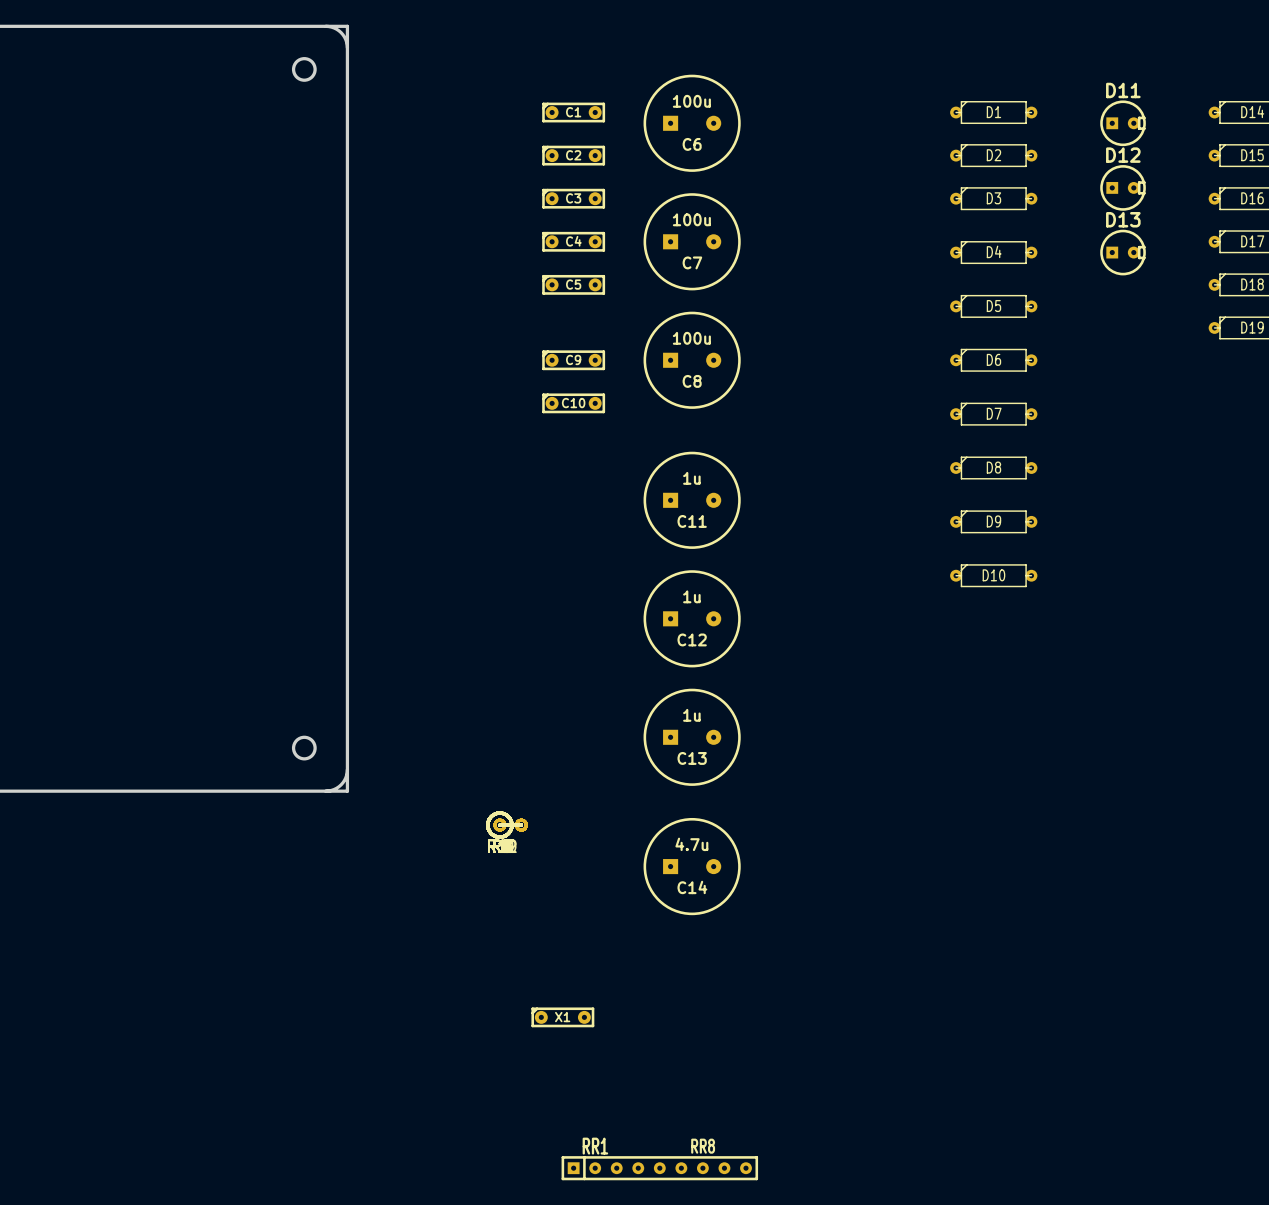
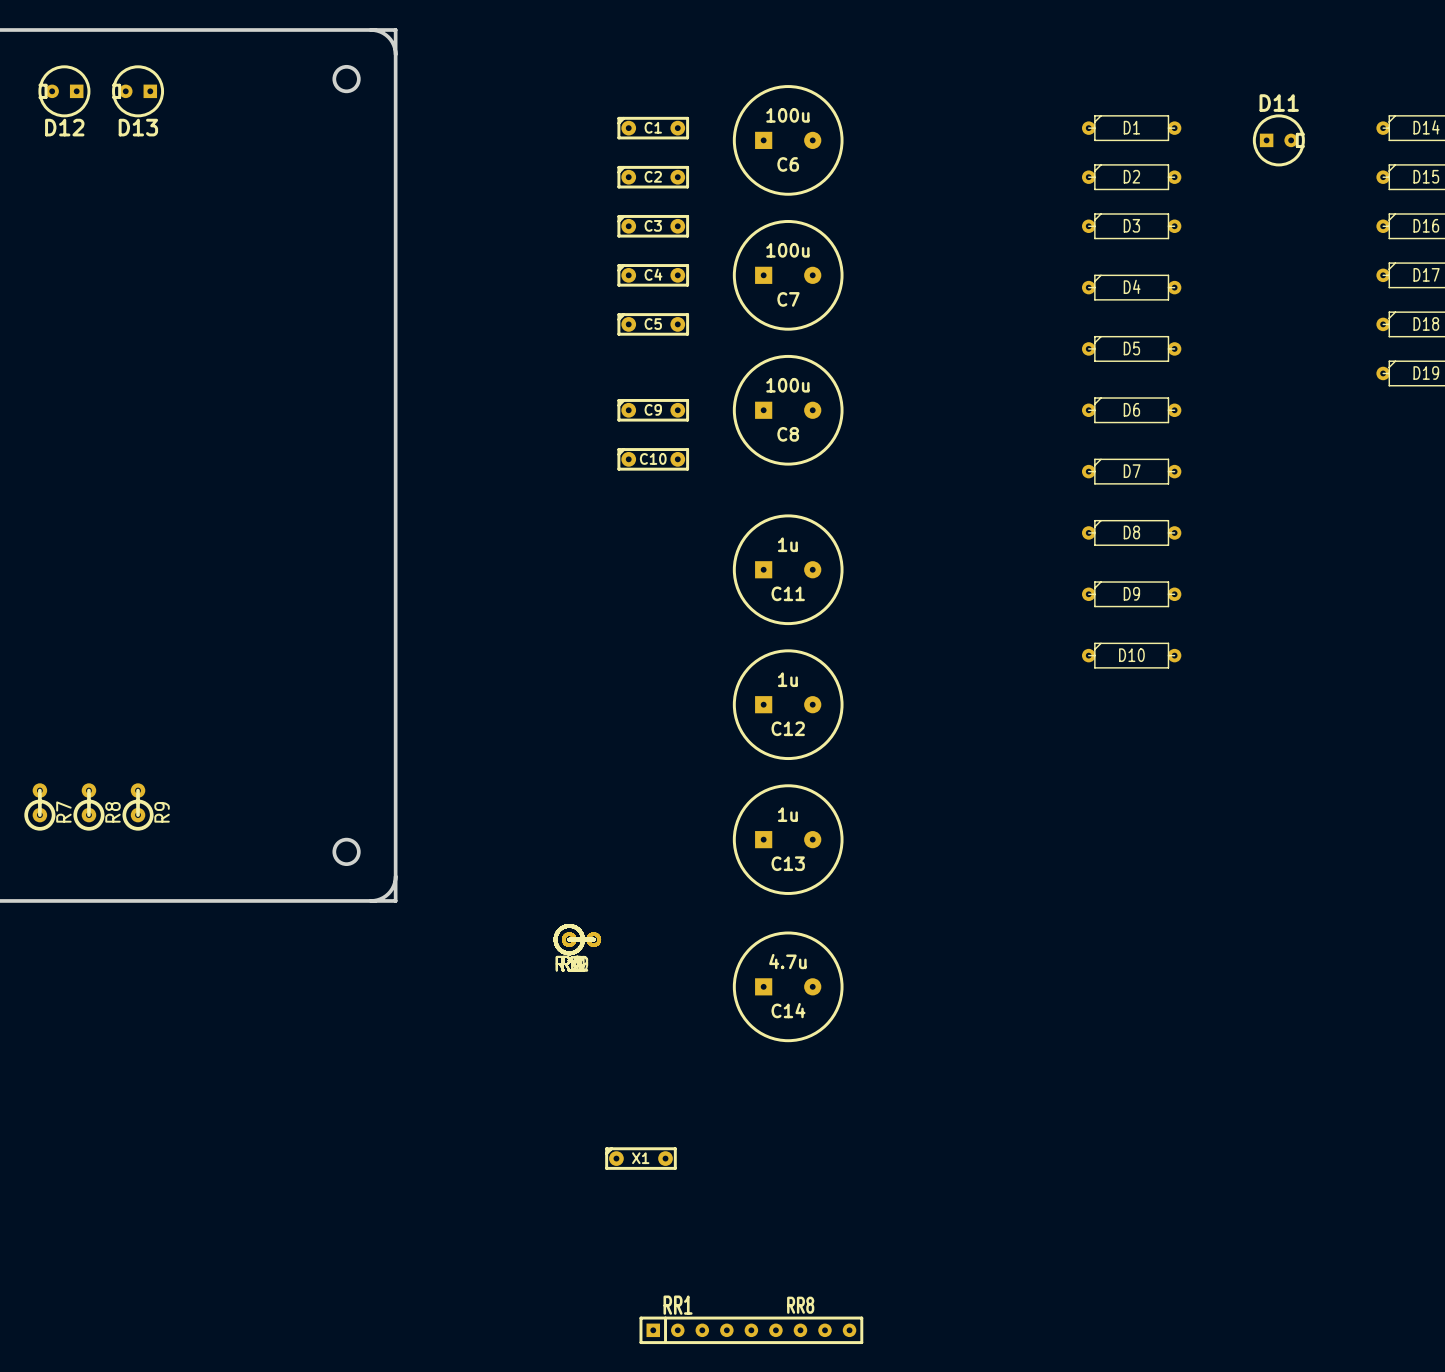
D12 rotation: 0° (1123, 187) -> 180° (64, 91)
D12 position: (1123, 187) -> (64, 91)
D13 rotation: 0° (1123, 252) -> 180° (138, 91)
D13 position: (1123, 252) -> (138, 91)
R7 rotation: 0° (507, 825) -> 90° counterclockwise (39, 806)
R7 position: (507, 825) -> (39, 806)
R8 rotation: 0° (507, 825) -> 90° counterclockwise (88, 806)
R8 position: (507, 825) -> (88, 806)
R9 rotation: 0° (507, 825) -> 90° counterclockwise (138, 806)
R9 position: (507, 825) -> (138, 806)

